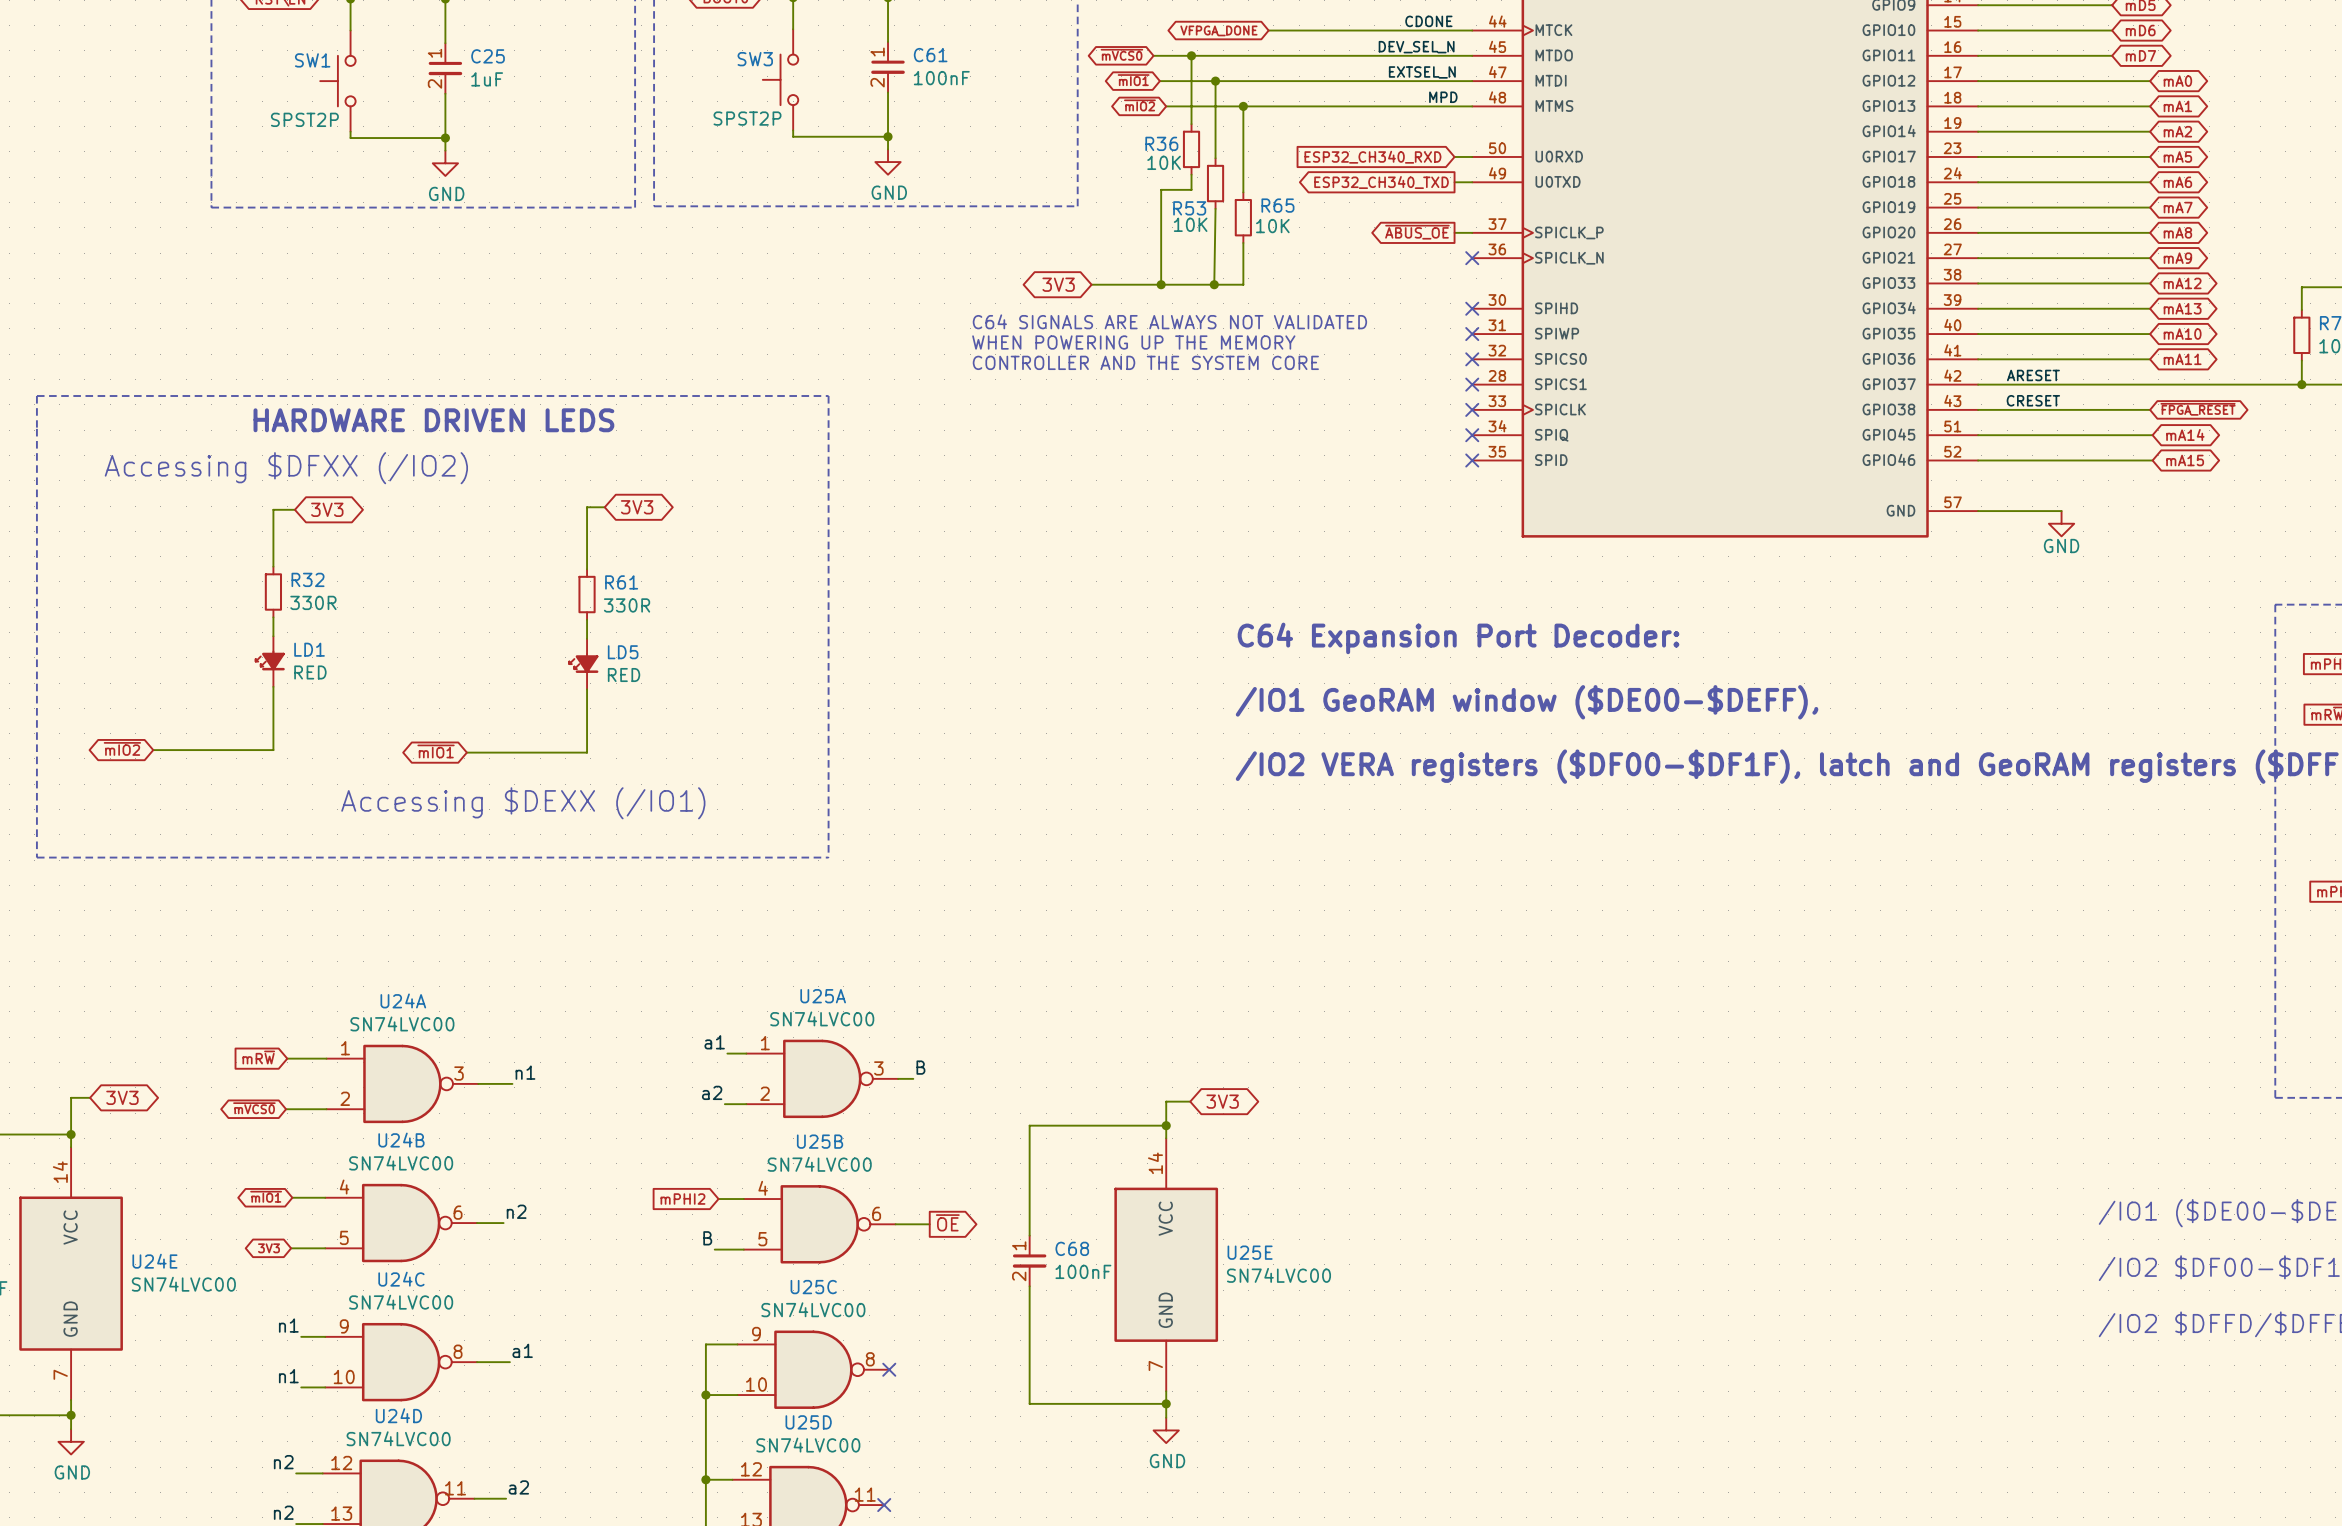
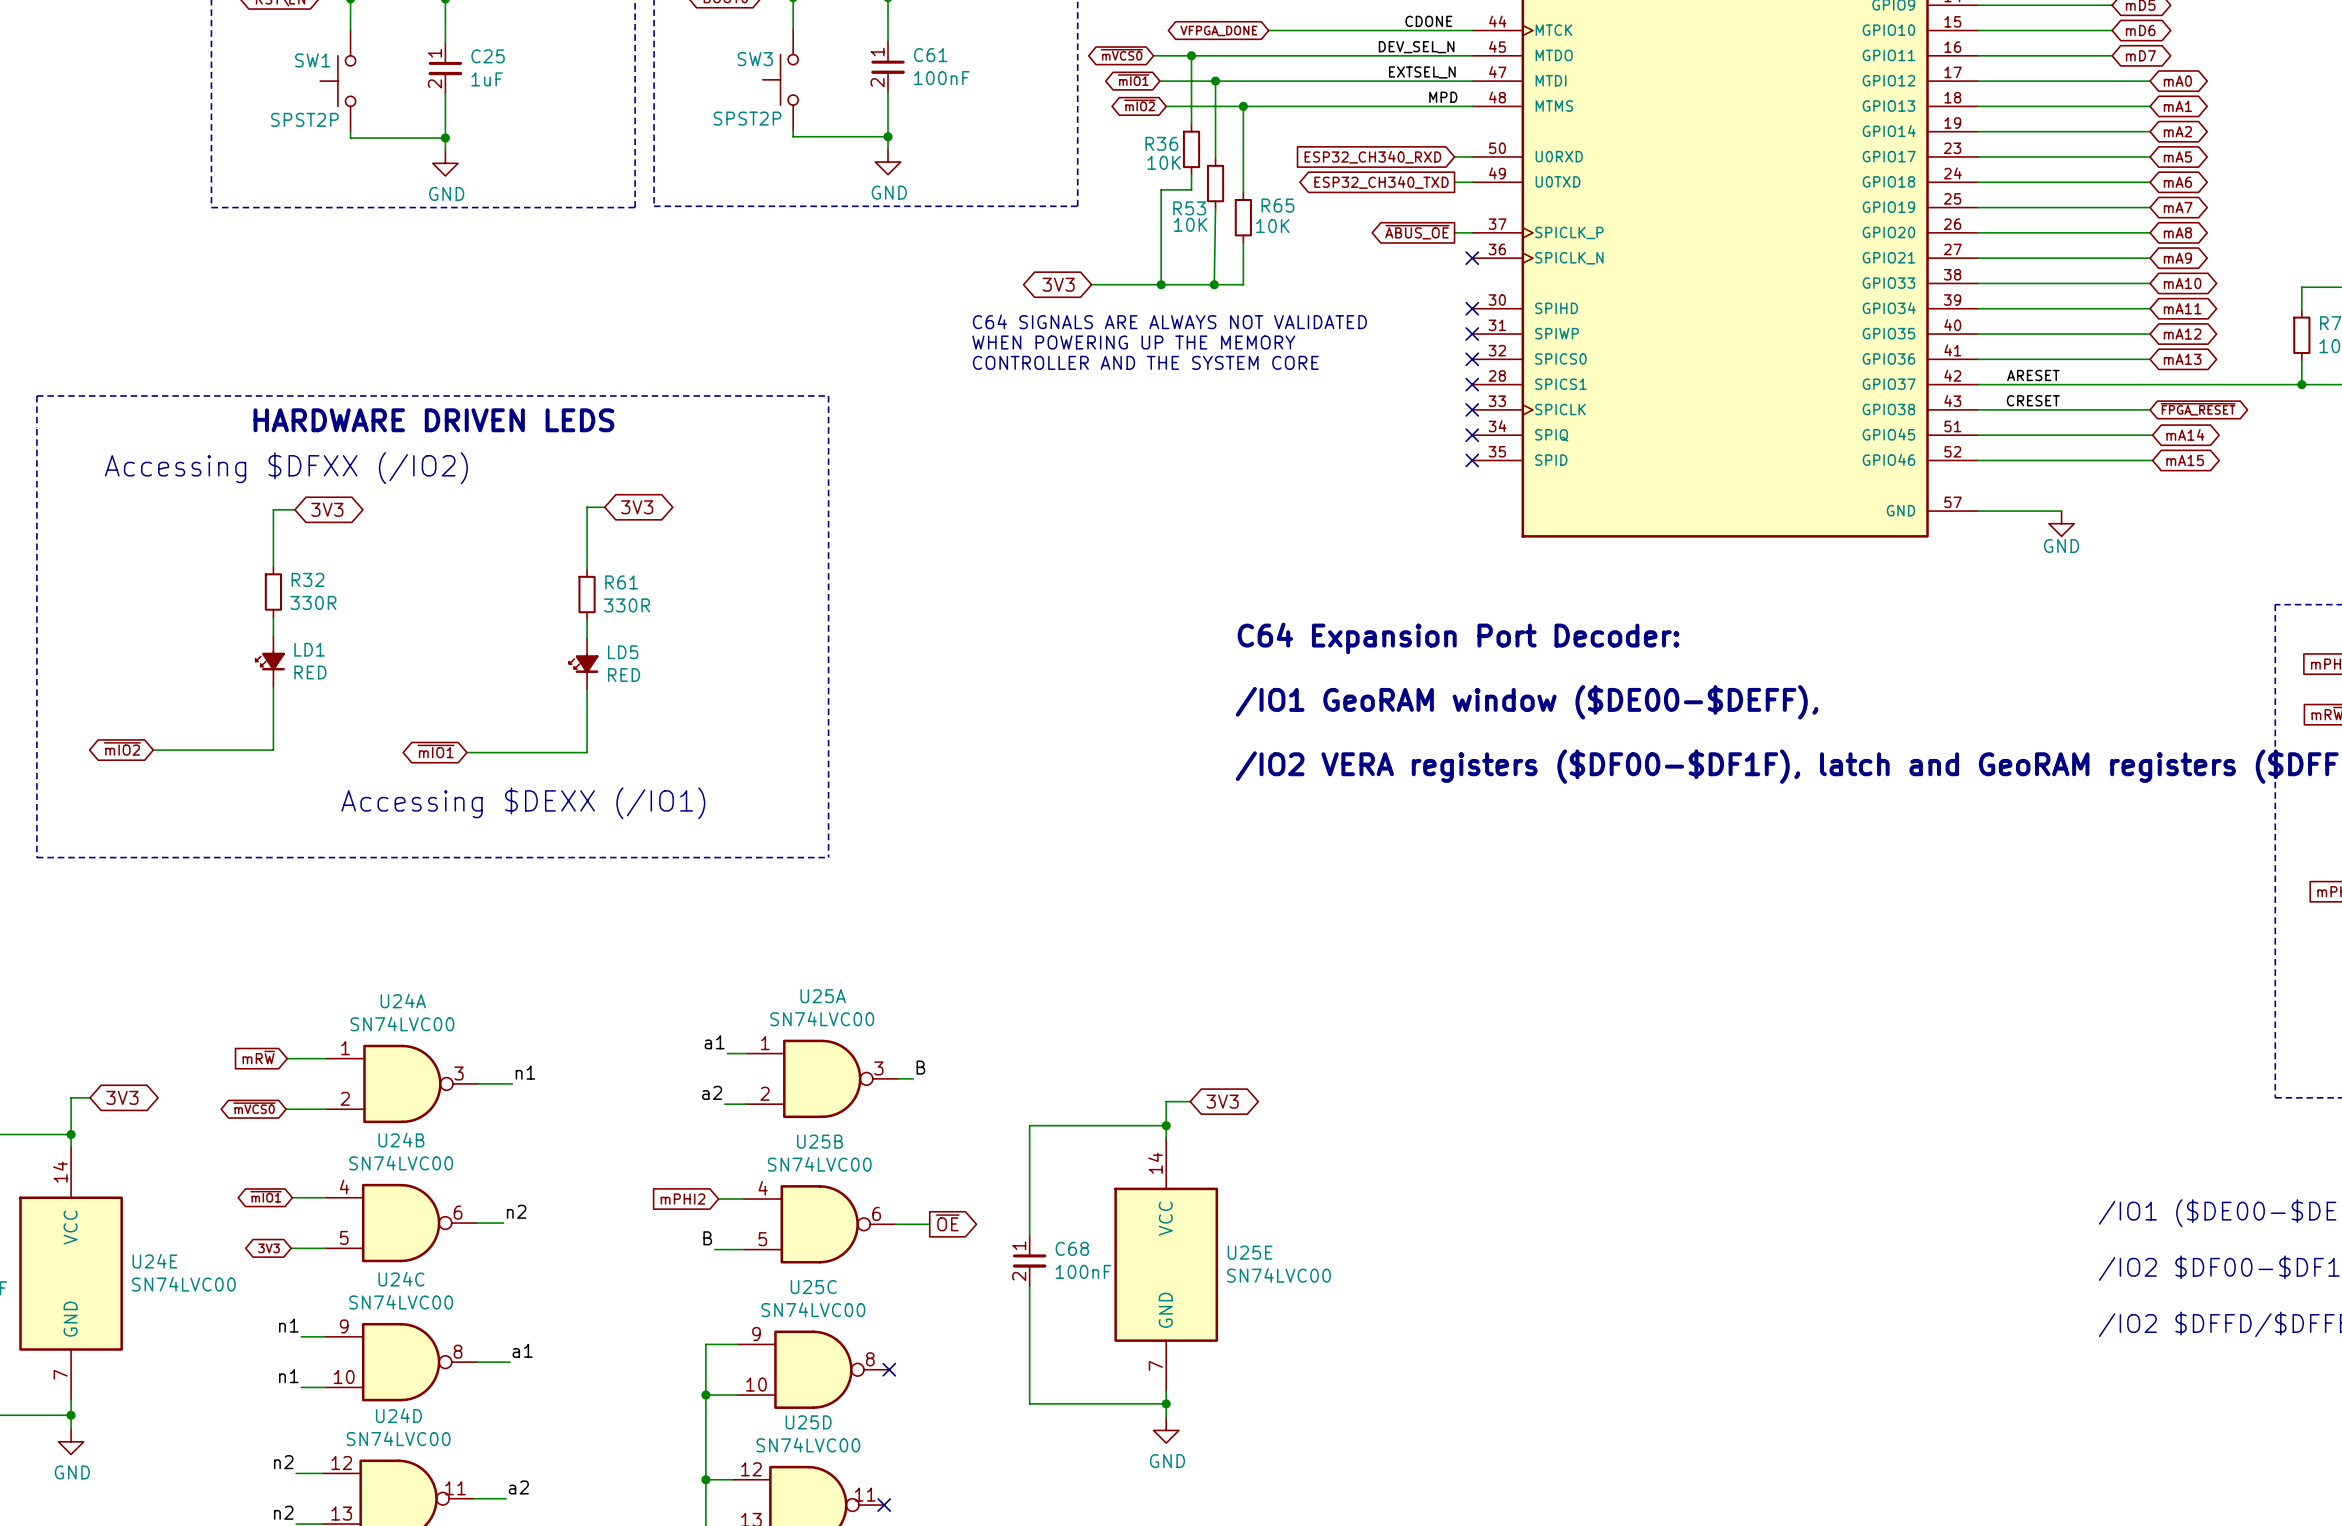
global label: mA12 (2182, 283) -> mA10 (2182, 283)
global label: mA13 (2182, 308) -> mA11 (2182, 308)
global label: mA10 (2182, 334) -> mA12 (2182, 334)
global label: mA11 (2182, 359) -> mA13 (2182, 359)

